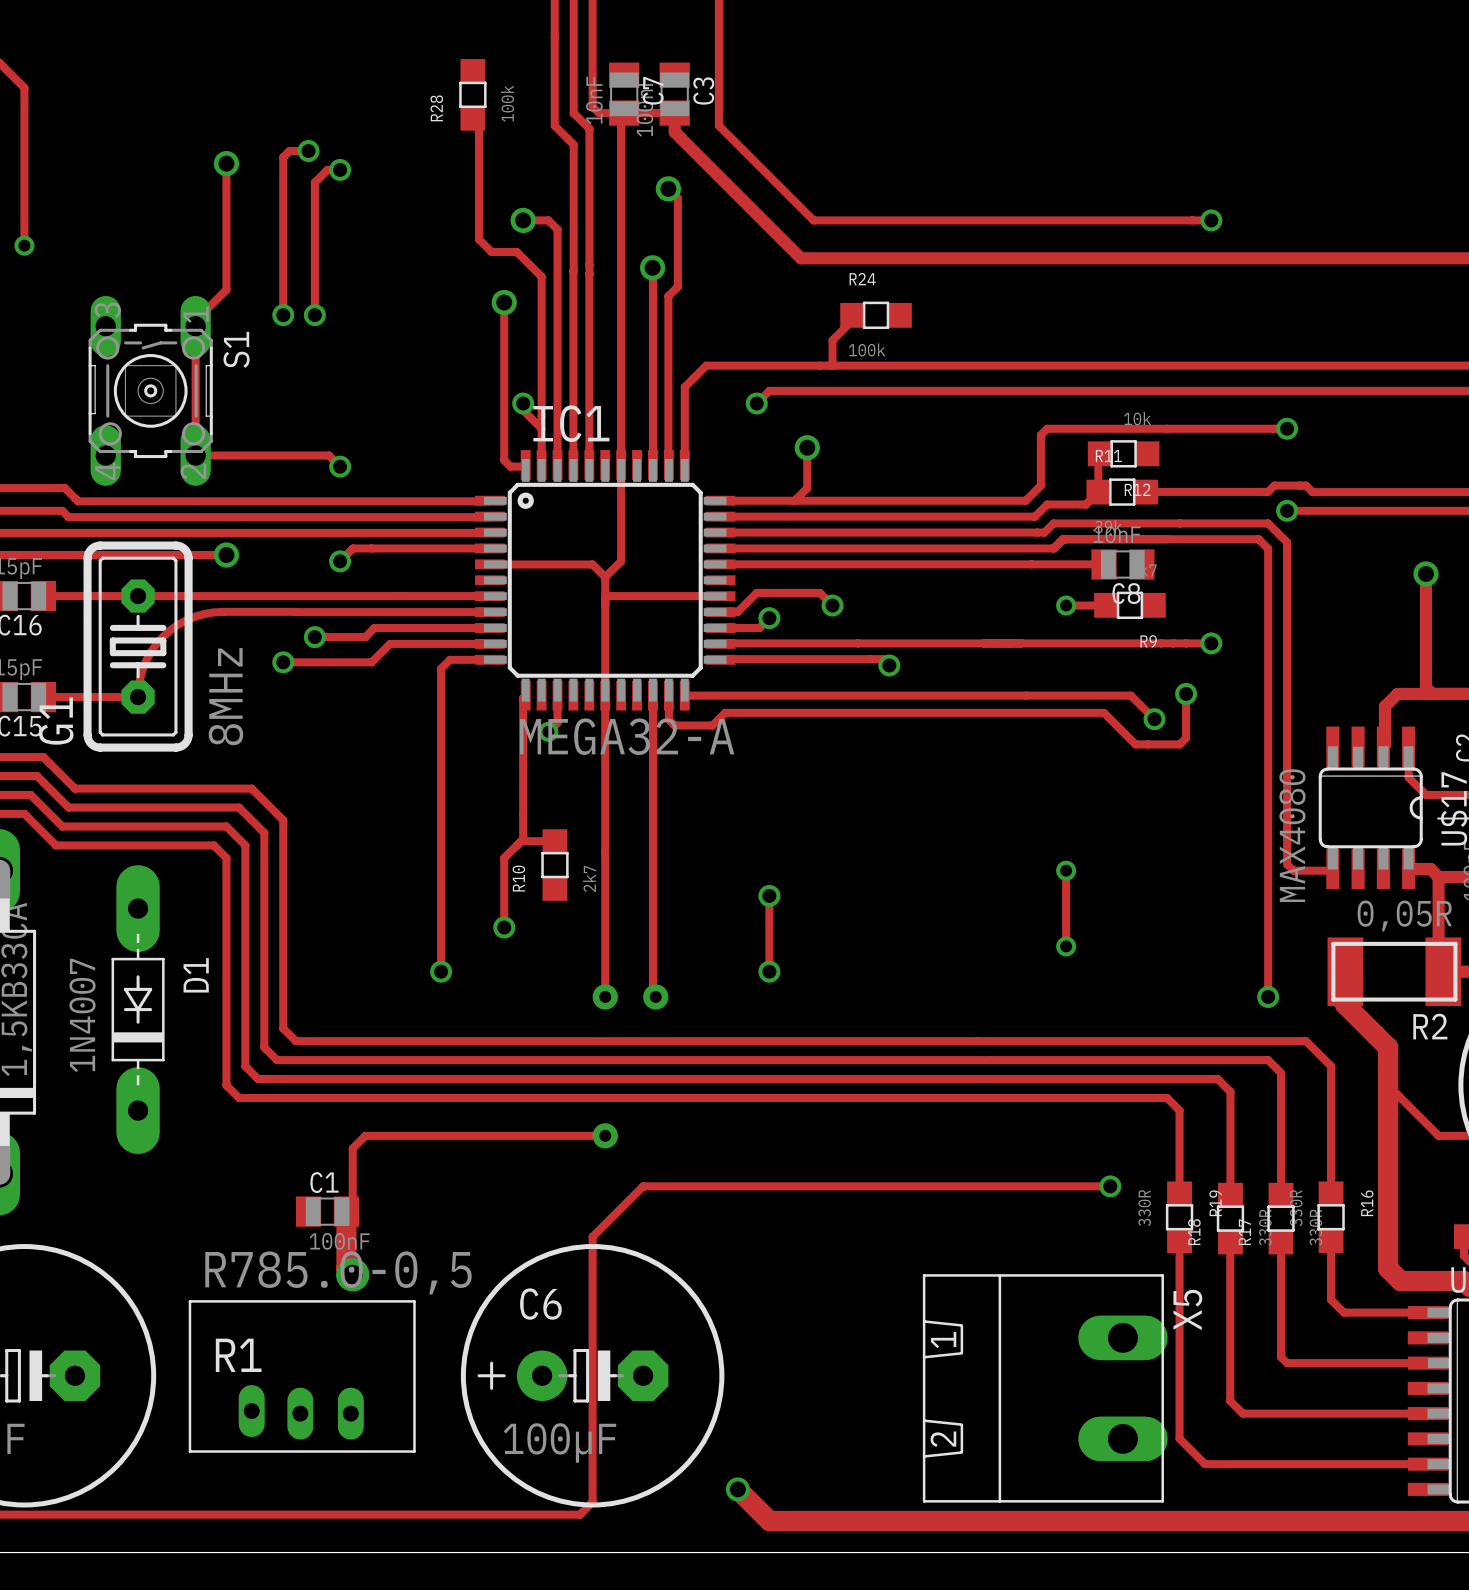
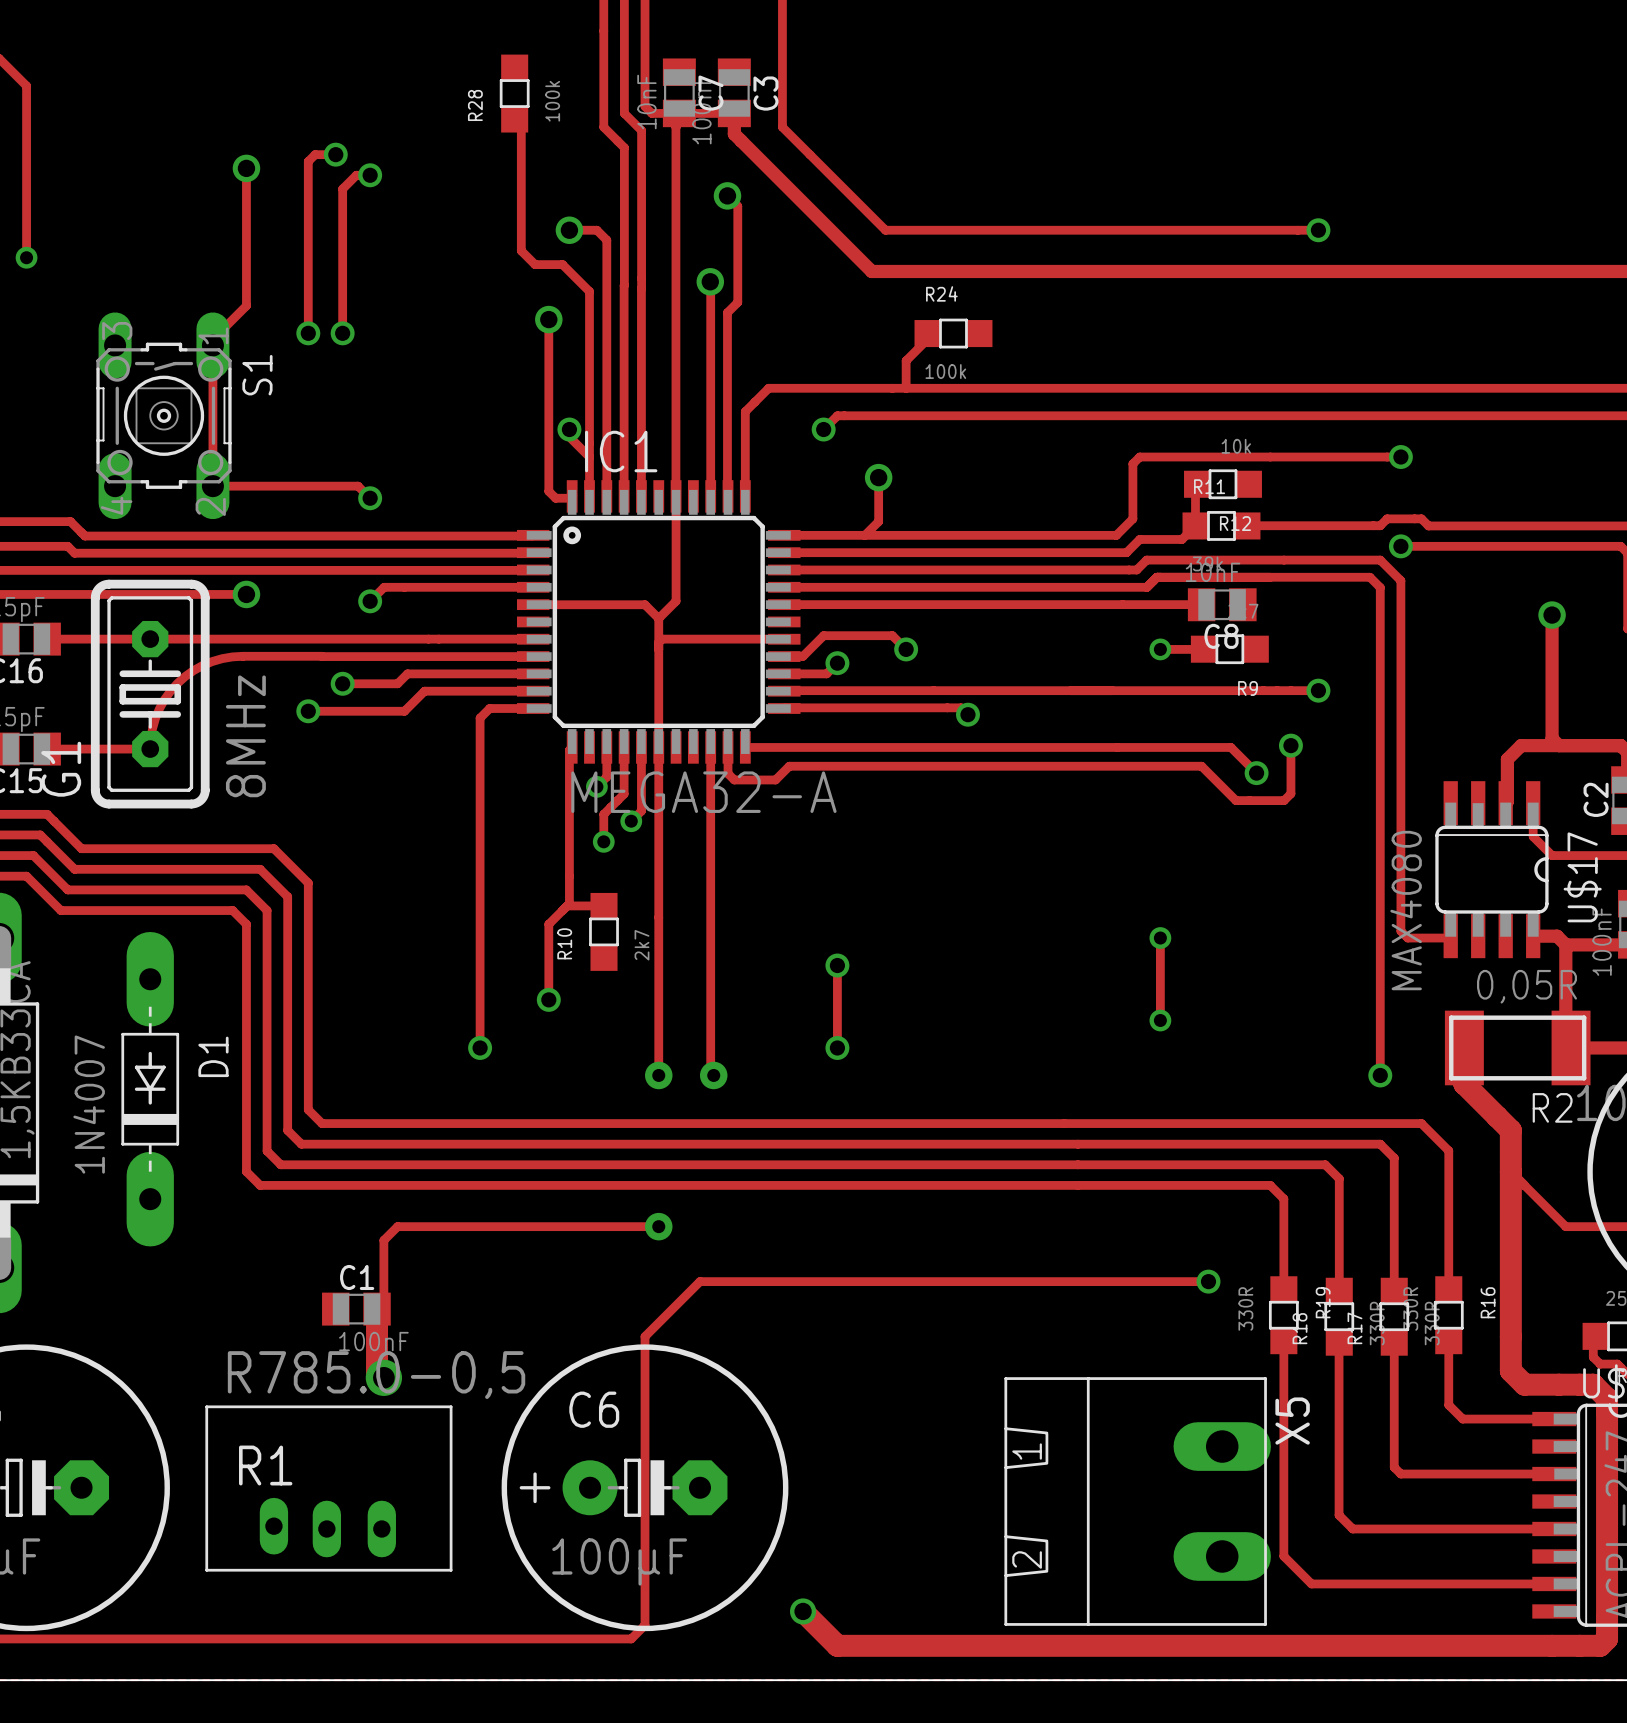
track: none -> (624, 747) (624, 794) (603, 814) (603, 841)
track: none -> (641, 747) (641, 811) (631, 821)
via: none -> (631, 821)
via: none -> (603, 841)

